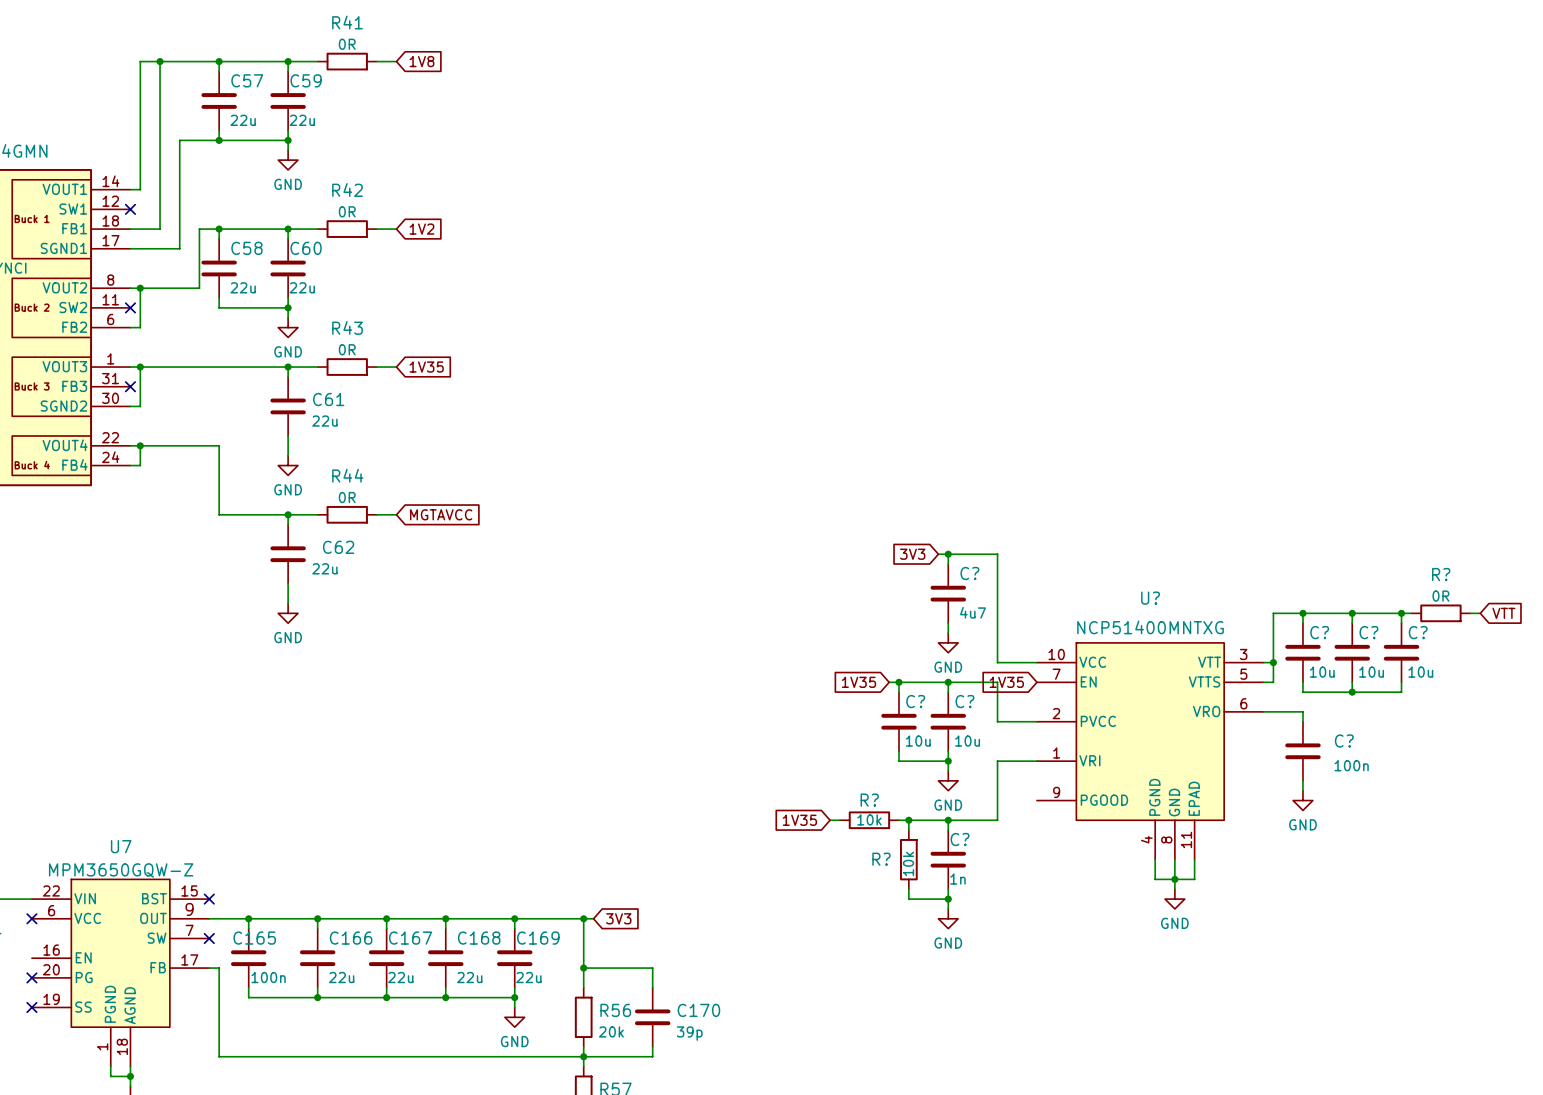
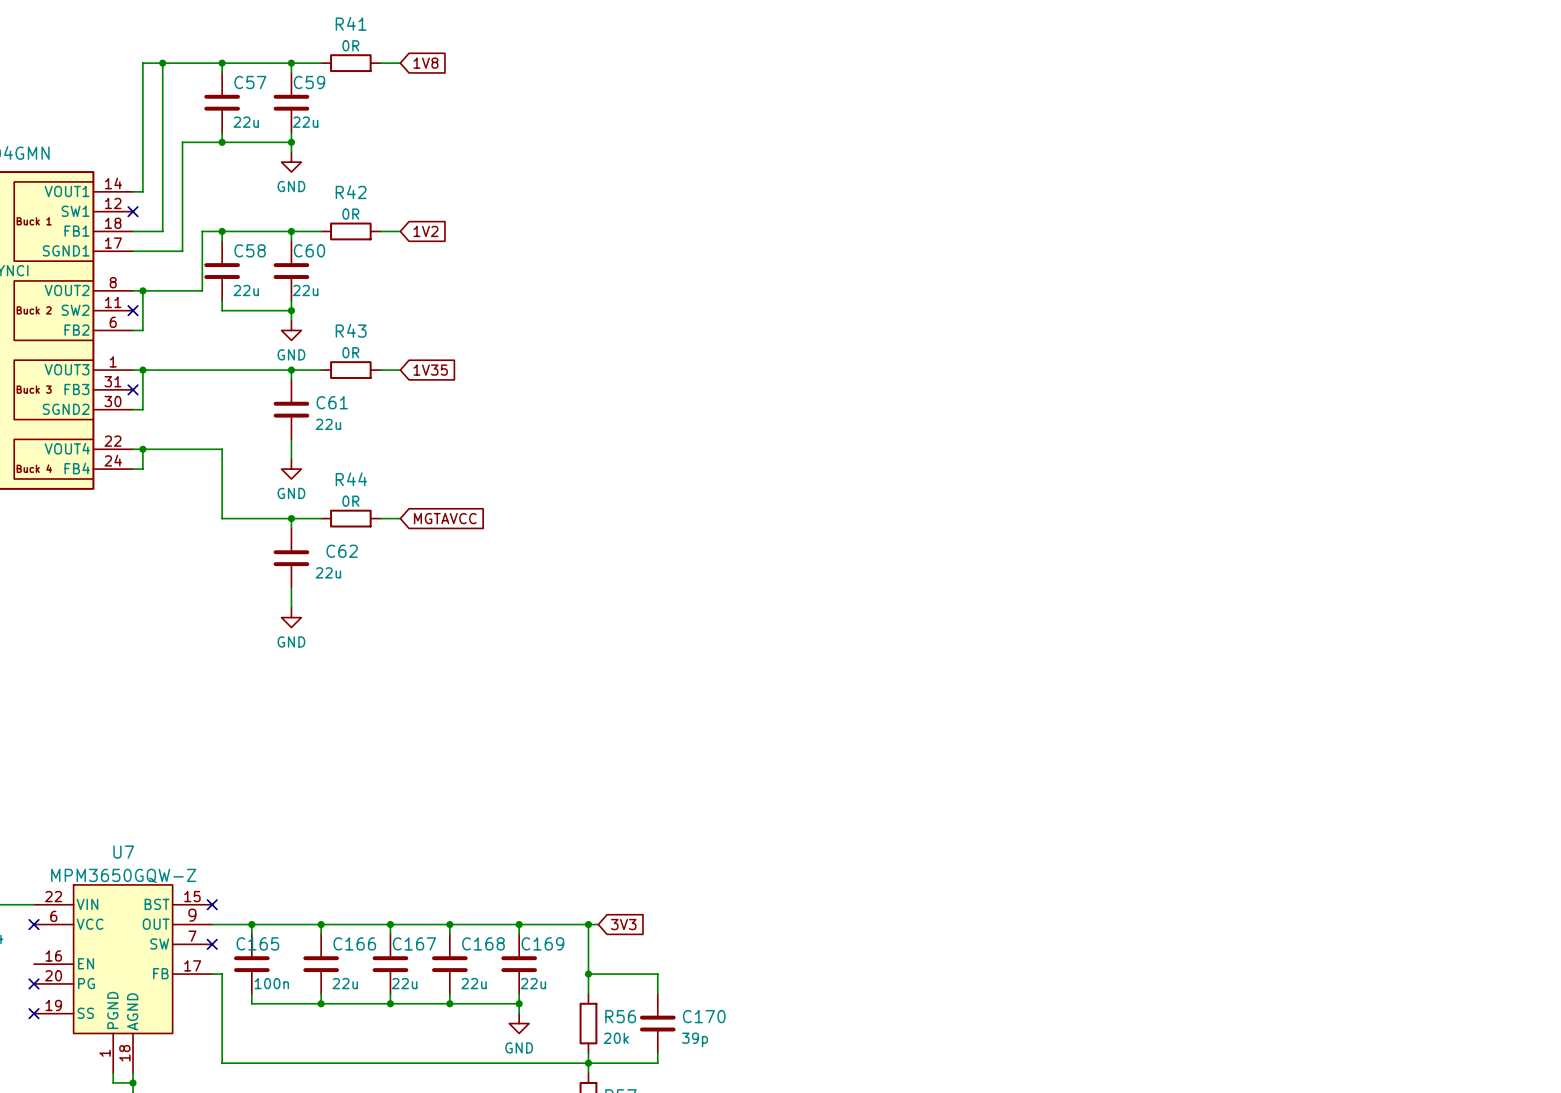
global label: 3V3 (912, 554) -> none
wire: (938, 554) (997, 554) (997, 662) (1036, 662) -> none
wire: (948, 554) (948, 564) -> none
junction: (948, 554) -> none
C?: (948, 593) -> none
wire: (1302, 613) (1302, 623) -> none
junction: (1302, 613) -> none
wire: (1352, 613) (1352, 623) -> none
junction: (1352, 613) -> none
wire: (1401, 613) (1401, 623) -> none
junction: (1401, 613) -> none
wire: (1411, 613) (1273, 613) (1273, 682) (1263, 682) -> none
R?: (1440, 613) -> none
wire: (1470, 613) (1480, 613) -> none
global label: VTT (1503, 613) -> none
wire: (948, 623) (948, 633) -> none
power symbol: GND (948, 642) -> none
C?: (1302, 652) -> none
C?: (1352, 652) -> none
C?: (1401, 652) -> none
wire: (1263, 662) (1273, 662) -> none
junction: (1273, 662) -> none
global label: 1V35 (858, 682) -> none
wire: (889, 682) (997, 682) (997, 721) (1036, 721) -> none
wire: (899, 682) (899, 692) -> none
junction: (899, 682) -> none
wire: (948, 682) (948, 692) -> none
junction: (948, 682) -> none
global label: 1V35 (1006, 682) -> none
wire: (1302, 682) (1302, 692) (1401, 692) (1401, 682) -> none
wire: (1352, 682) (1352, 692) -> none
junction: (1352, 692) -> none
wire: (1263, 711) (1302, 711) (1302, 721) -> none
C?: (899, 721) -> none
C?: (948, 721) -> none
wire: (899, 751) (899, 761) (948, 761) -> none
wire: (948, 751) (948, 771) -> none
U?: NCP51400MNTXG (1150, 751) -> none
C?: (1302, 751) -> none
junction: (948, 761) -> none
wire: (1036, 761) (997, 761) (997, 820) (899, 820) -> none
power symbol: GND (948, 780) -> none
wire: (1302, 780) (1302, 790) -> none
power symbol: GND (1302, 800) -> none
global label: 1V35 (799, 820) -> none
wire: (830, 820) (839, 820) -> none
R?: (869, 820) -> none
wire: (908, 820) (908, 830) -> none
junction: (908, 820) -> none
wire: (948, 820) (948, 830) -> none
junction: (948, 820) -> none
R?: (908, 859) -> none
C?: (948, 859) -> none
wire: (1155, 859) (1155, 879) (1194, 879) (1194, 859) -> none
wire: (1174, 859) (1174, 889) -> none
junction: (1174, 879) -> none
wire: (908, 889) (908, 899) (948, 899) -> none
wire: (948, 889) (948, 908) -> none
junction: (948, 899) -> none
power symbol: GND (1174, 899) -> none
power symbol: GND (948, 918) -> none

